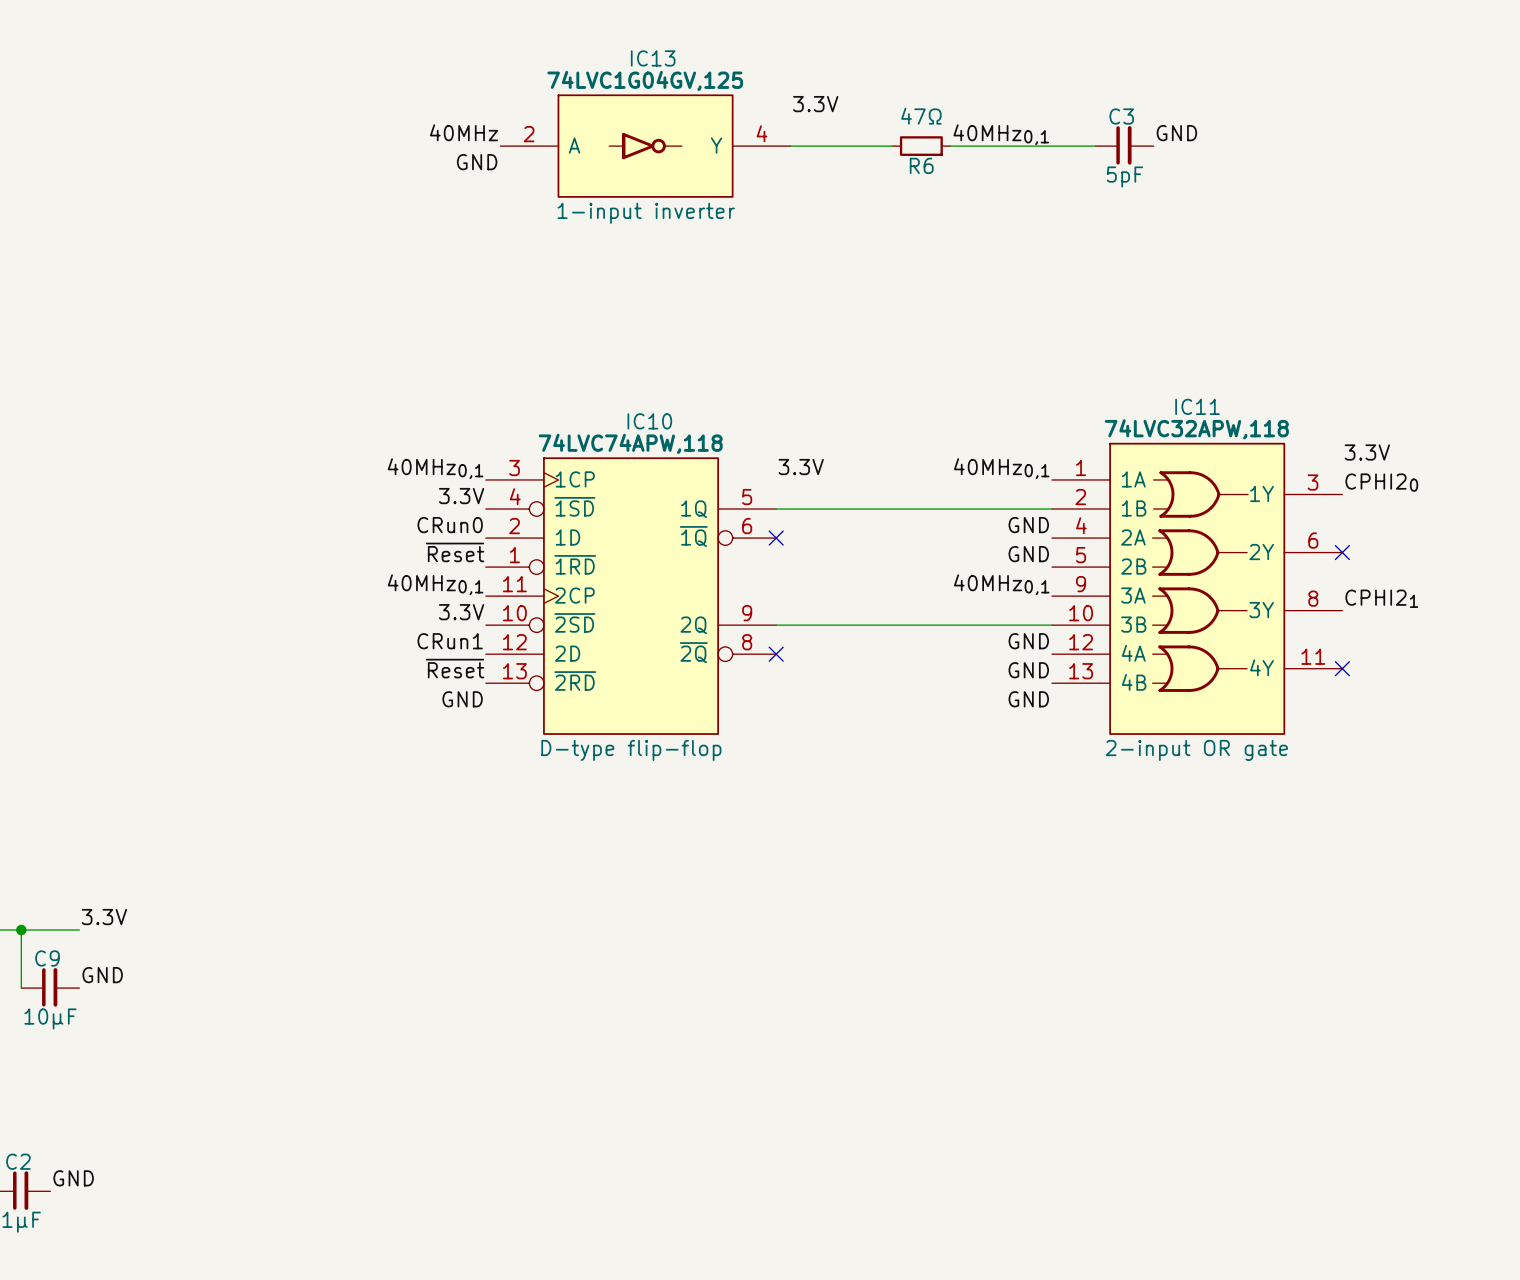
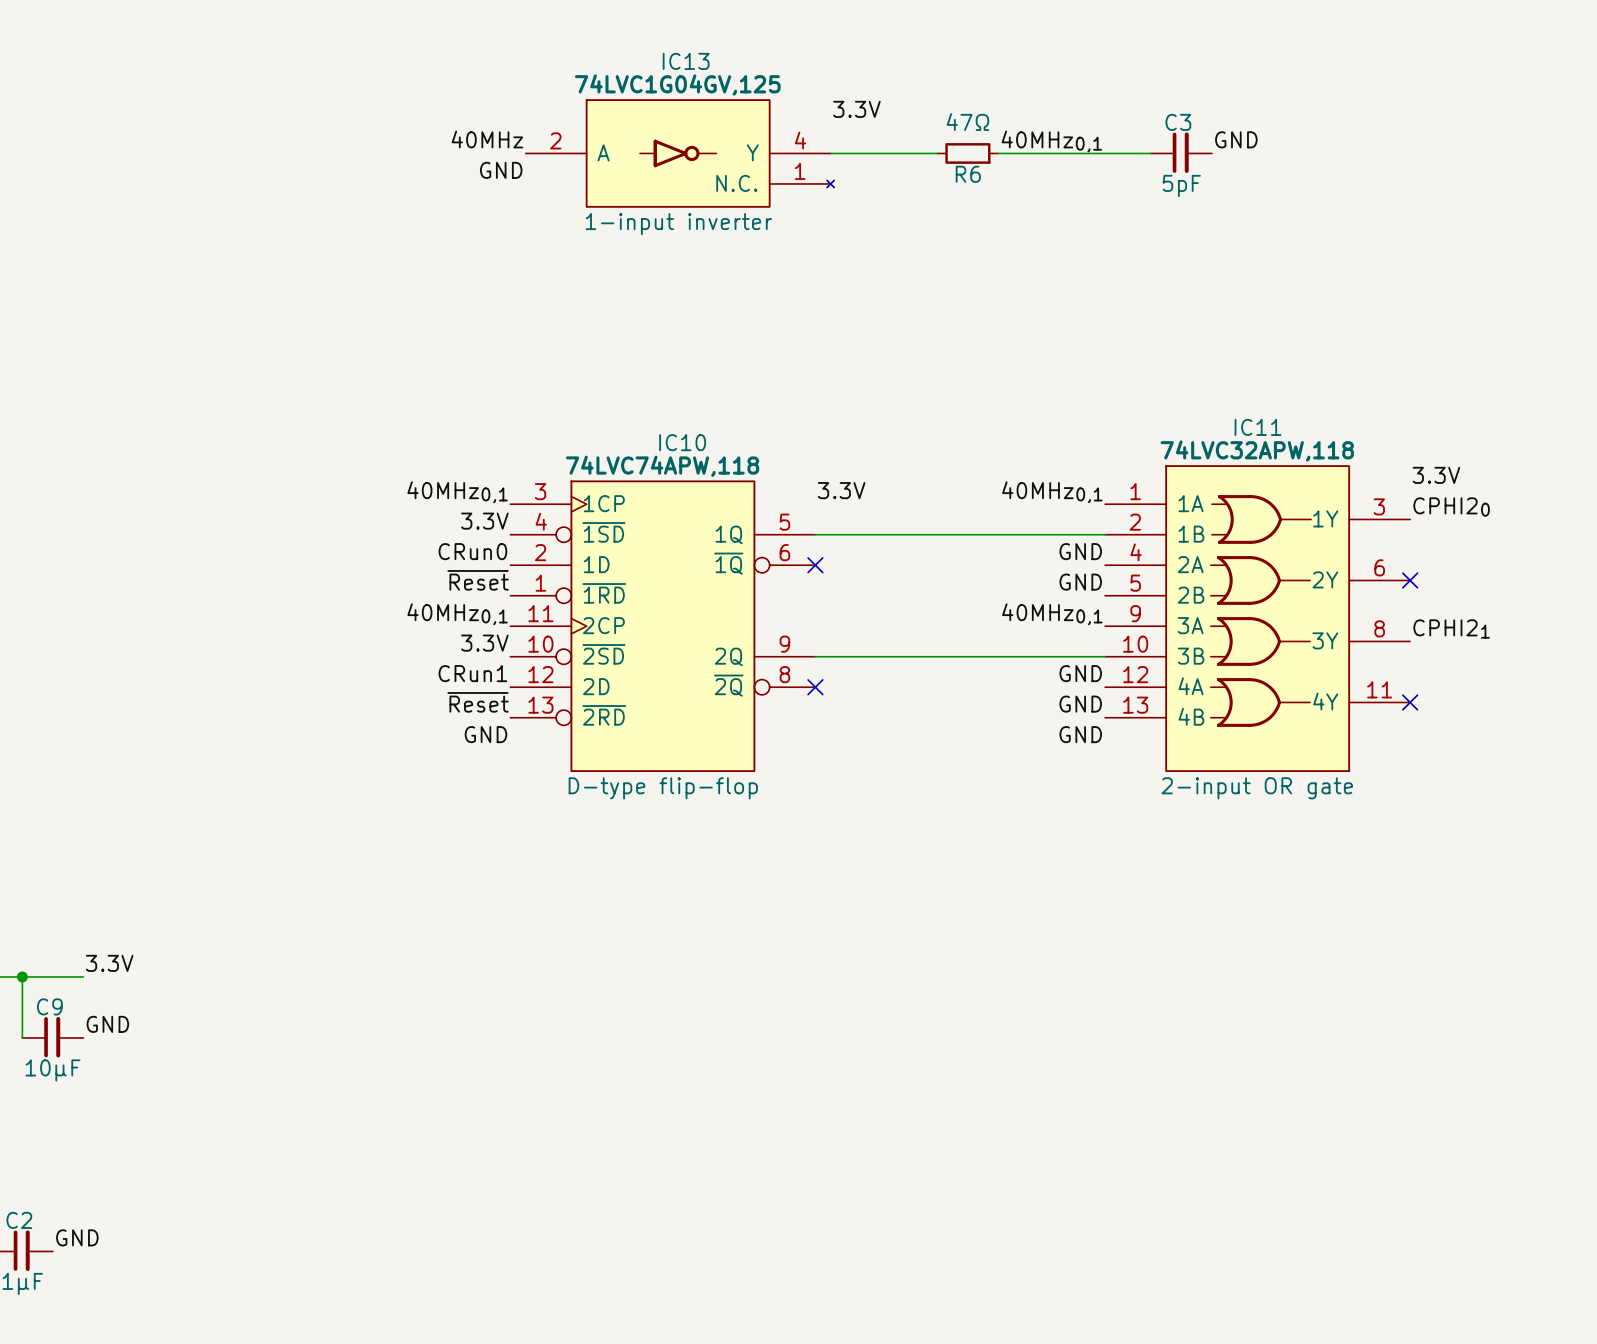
IC13 symbol: [500, 94, 791, 198] -> [525, 99, 835, 208]

